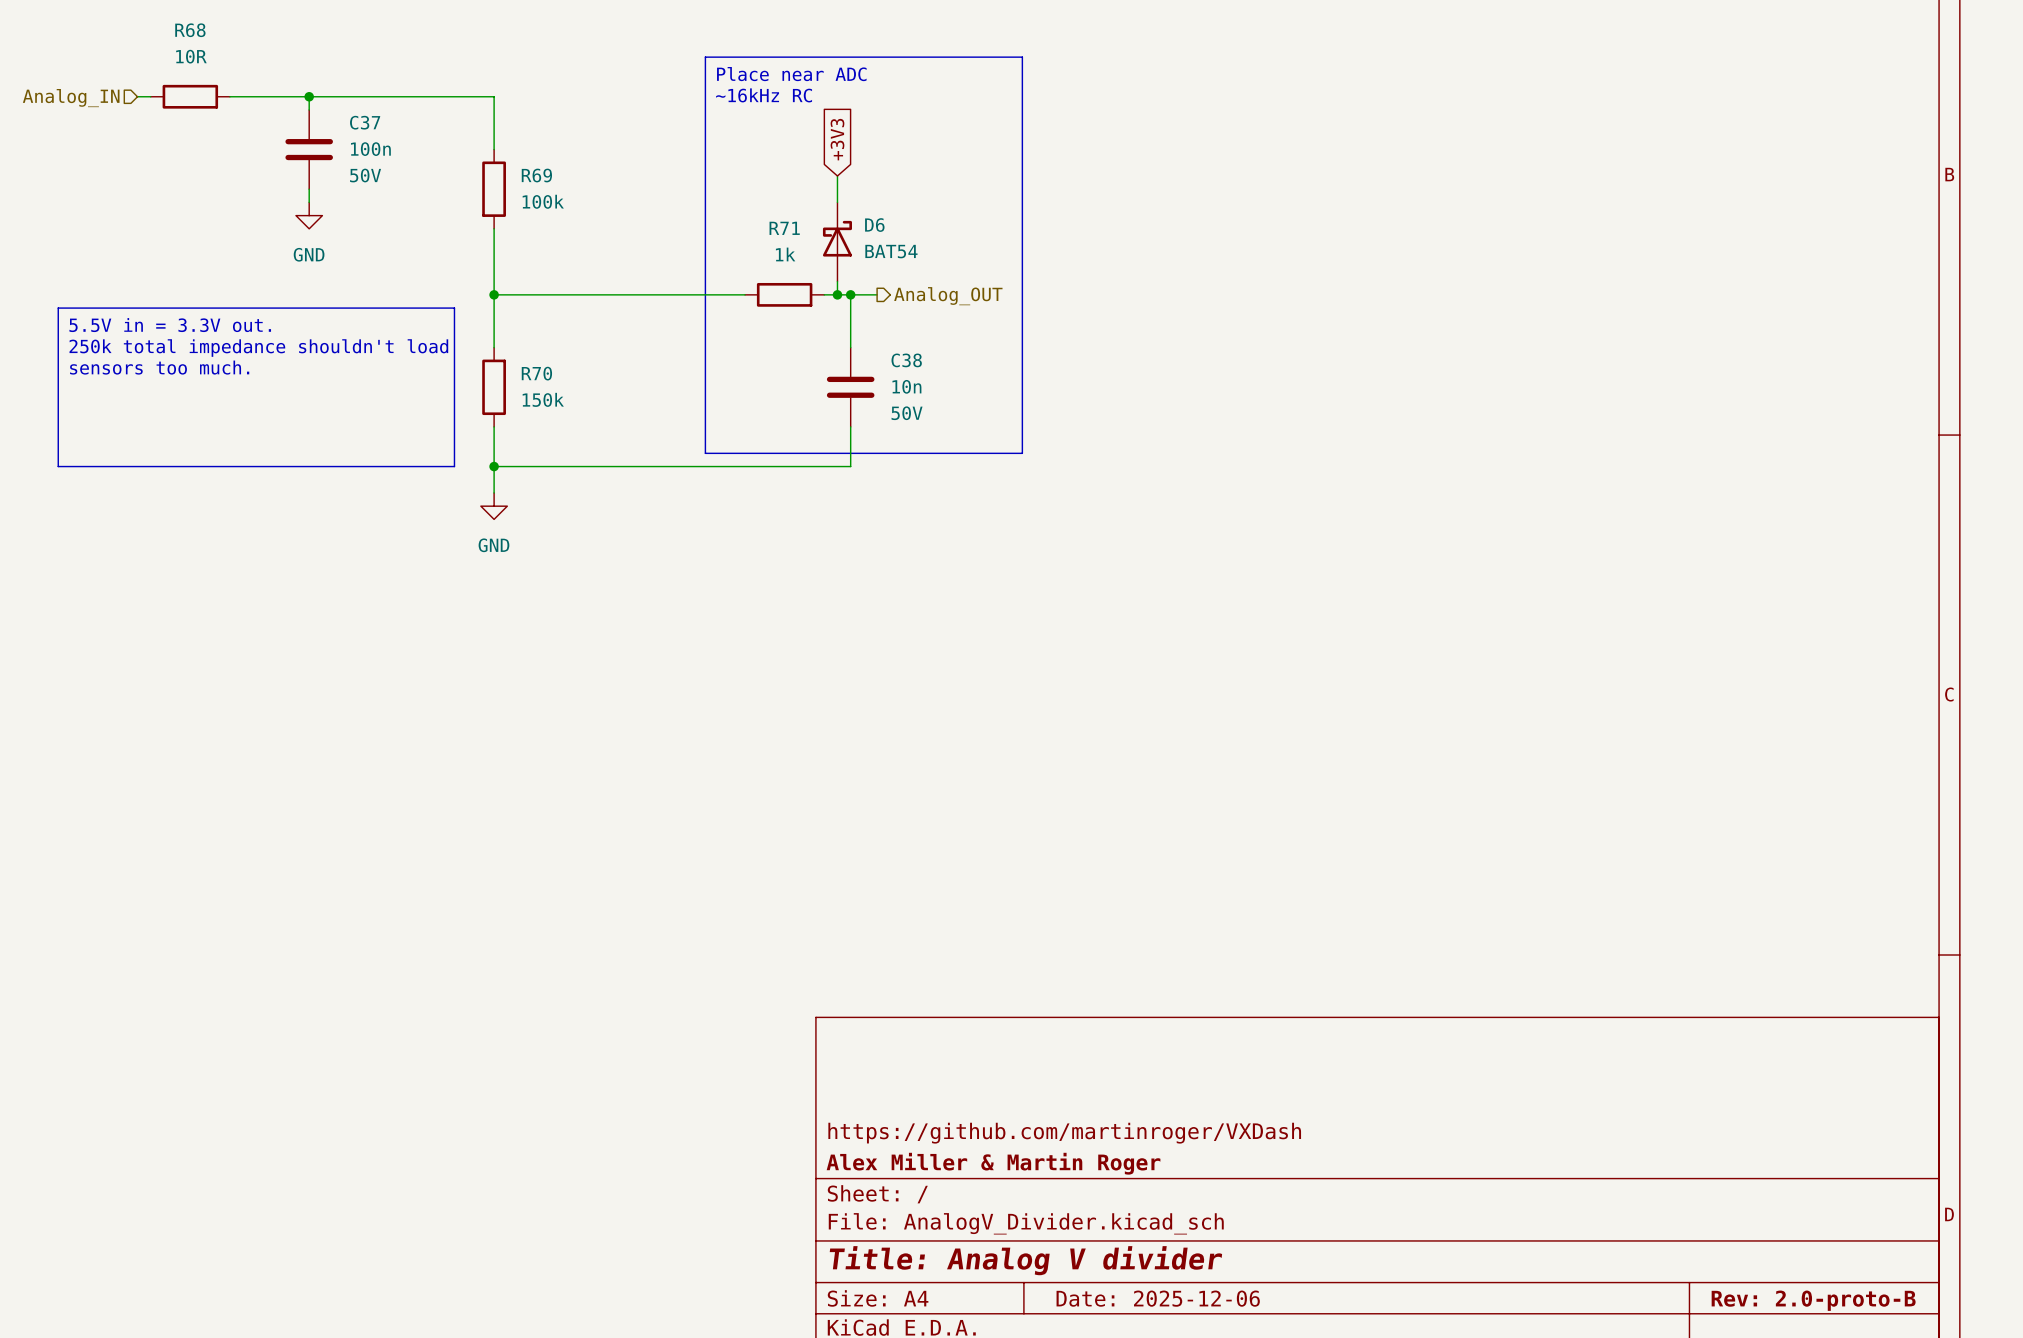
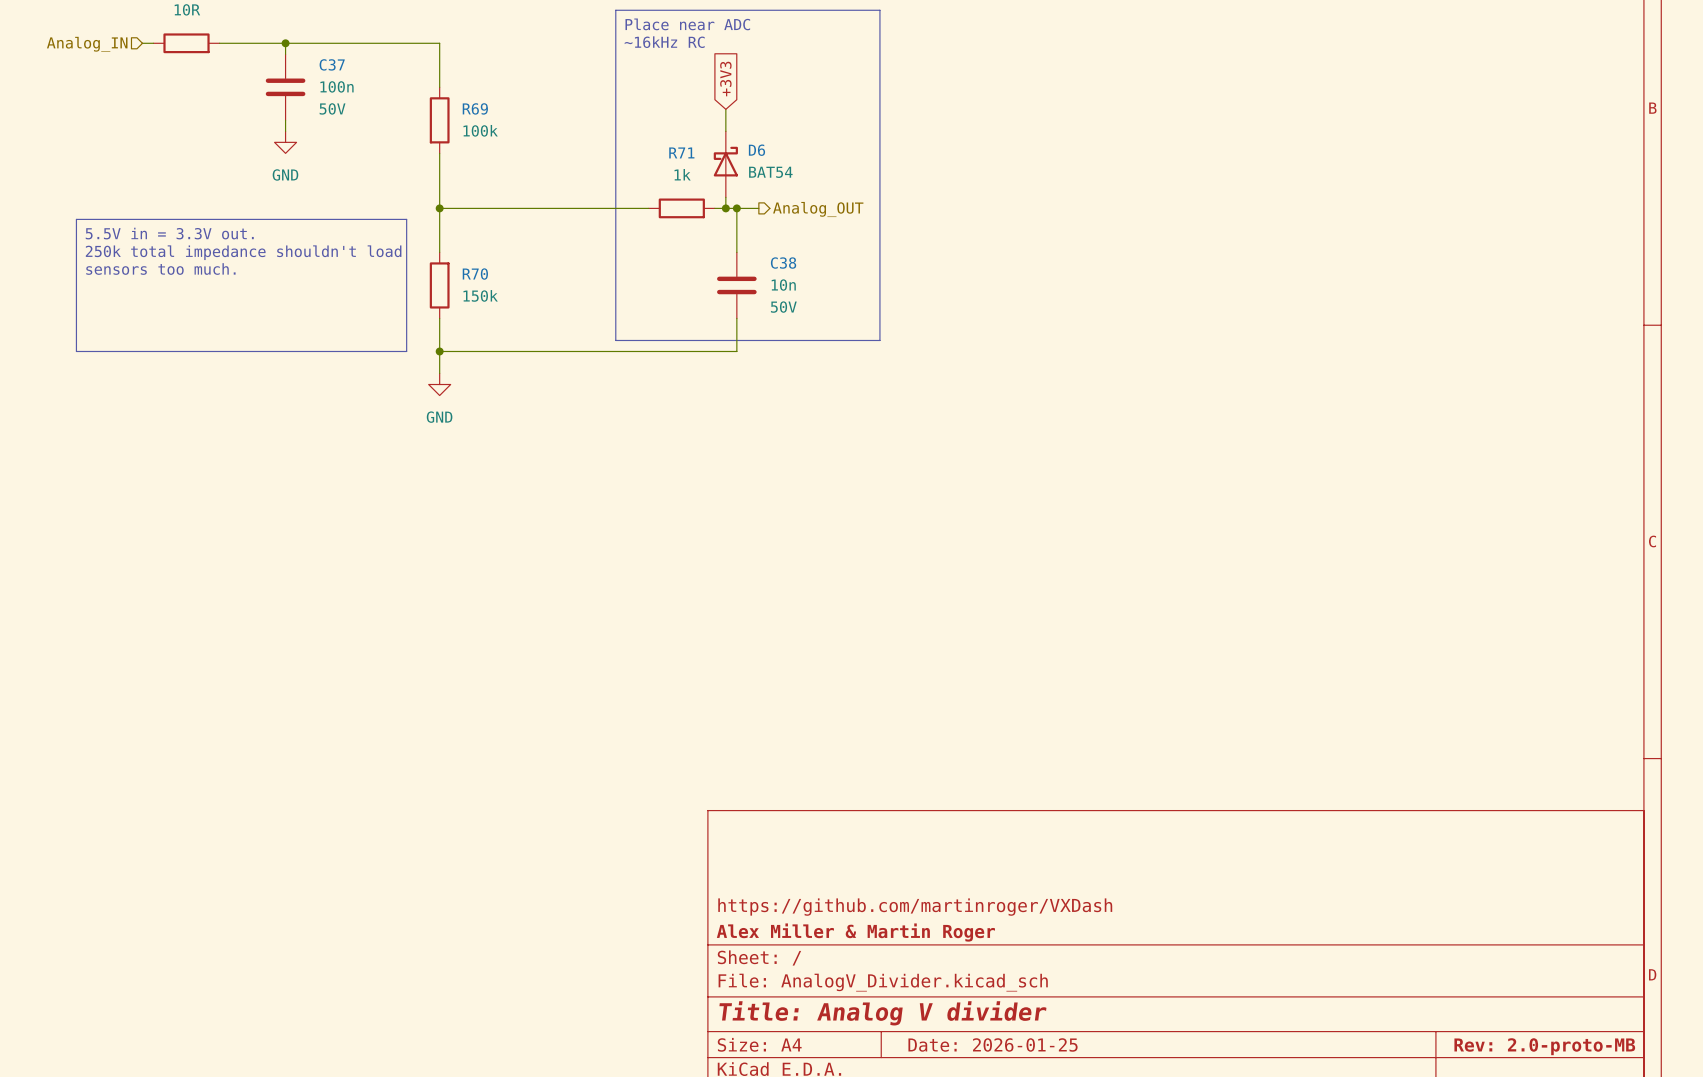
title block: Date: 2025-12-06 (1158, 1298) -> Date: 2026-01-25 (993, 1044)
title block: Rev: 2.0-proto-B (1813, 1300) -> Rev: 2.0-proto-MB (1544, 1046)

